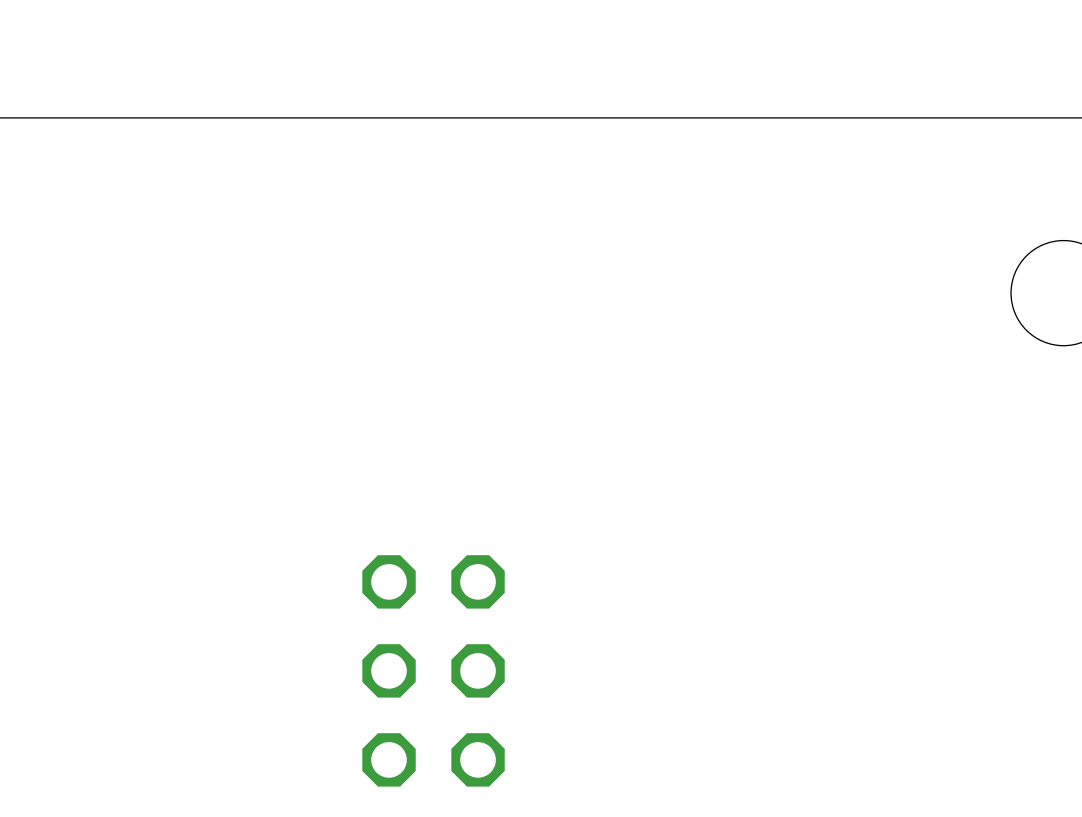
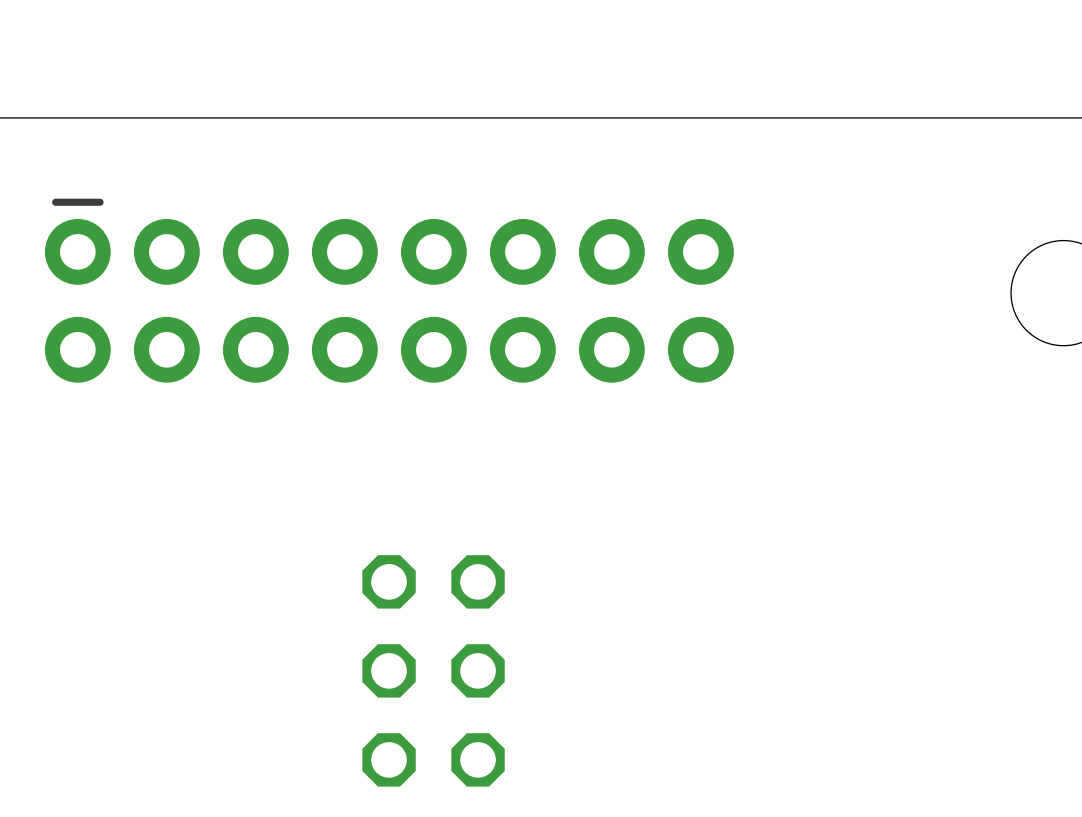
part: none -> (389, 290)

